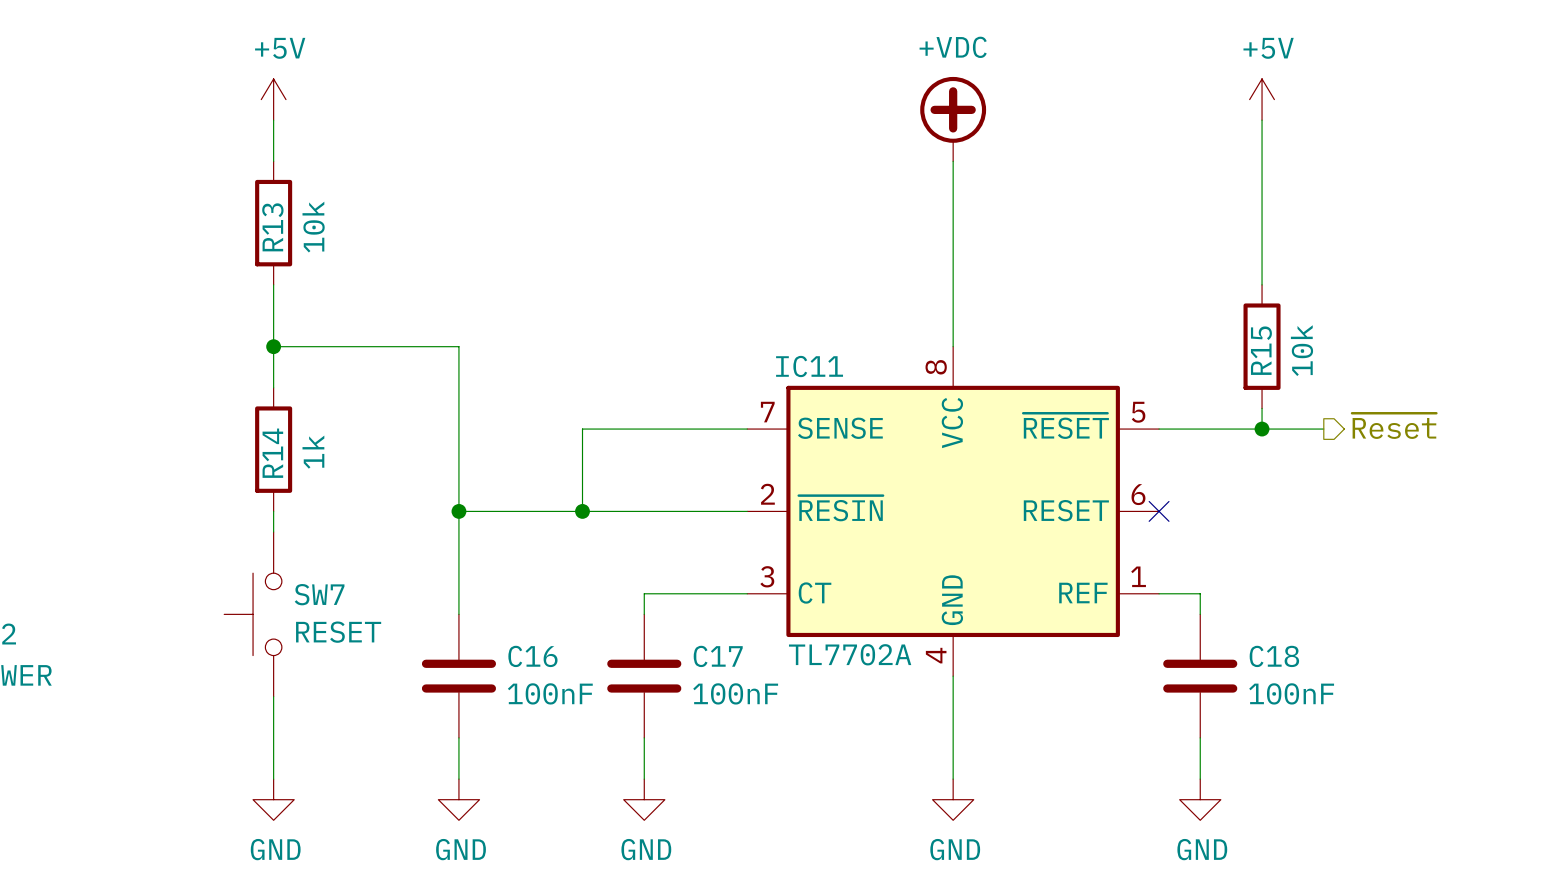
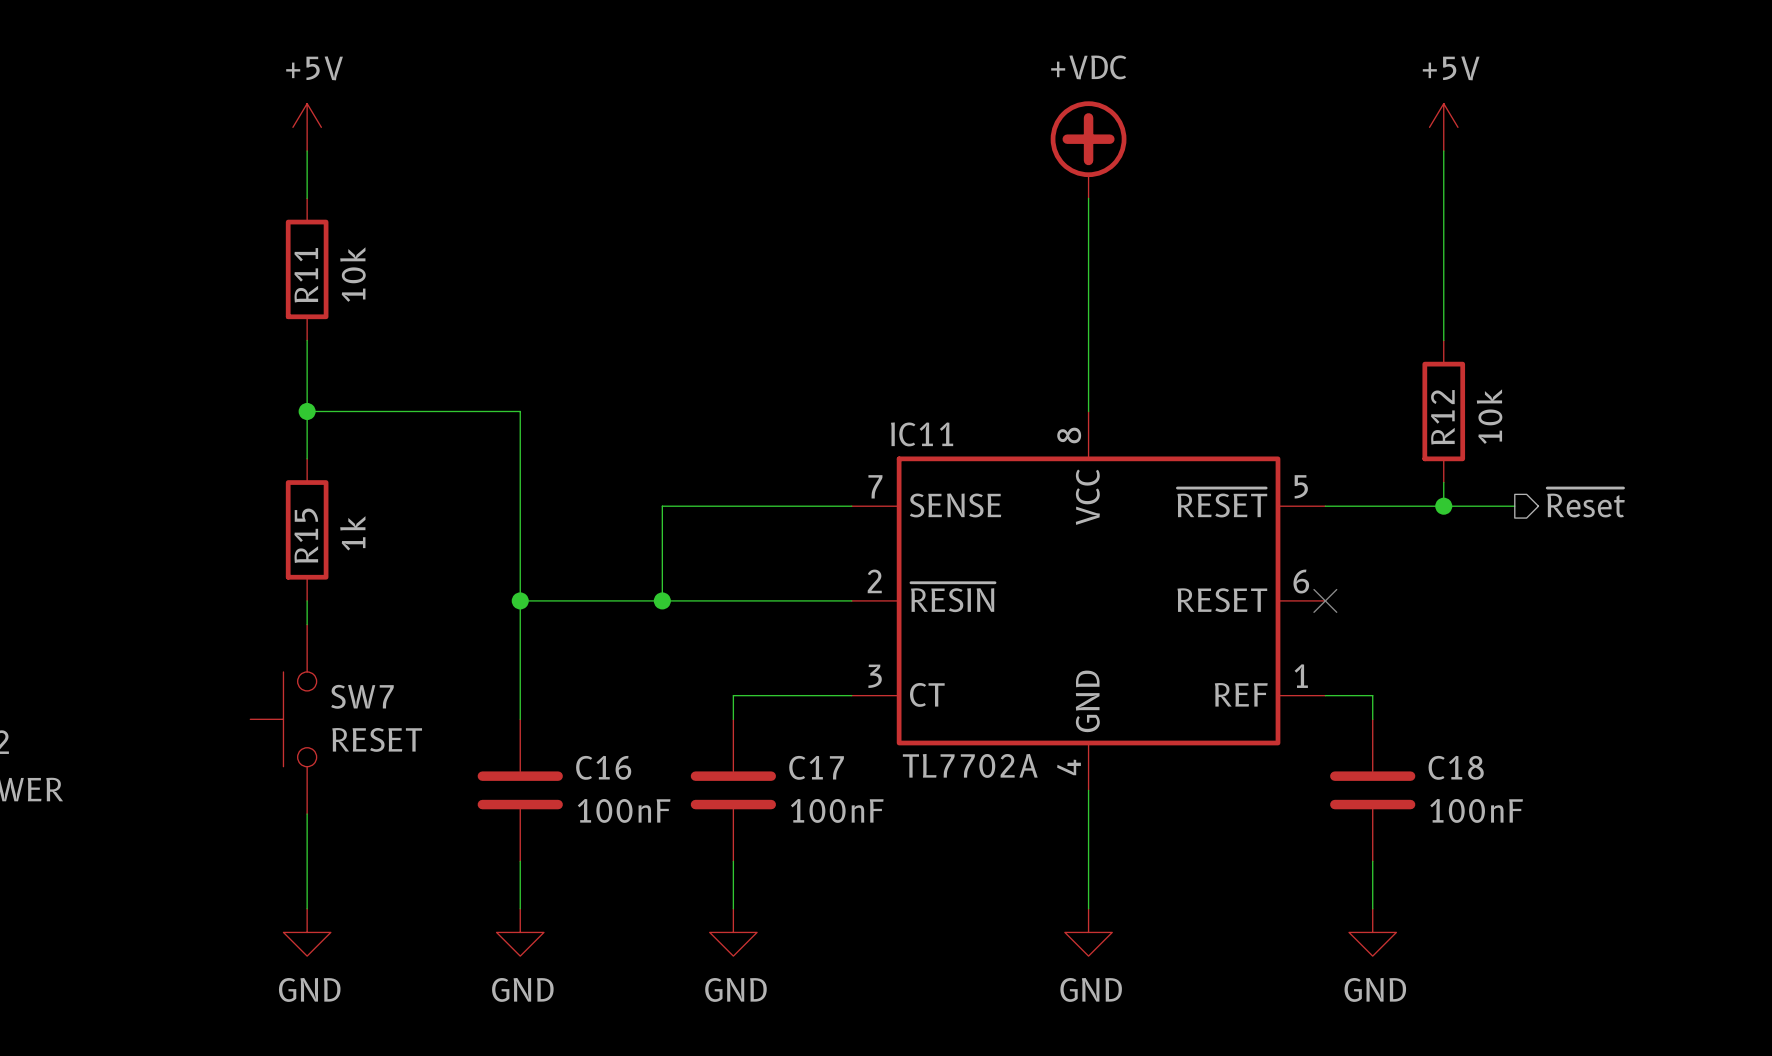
R13 name: R13 (272, 227) -> R11 (306, 275)
R15 name: R15 (1261, 350) -> R12 (1442, 417)
R14 name: R14 (272, 453) -> R15 (306, 535)

